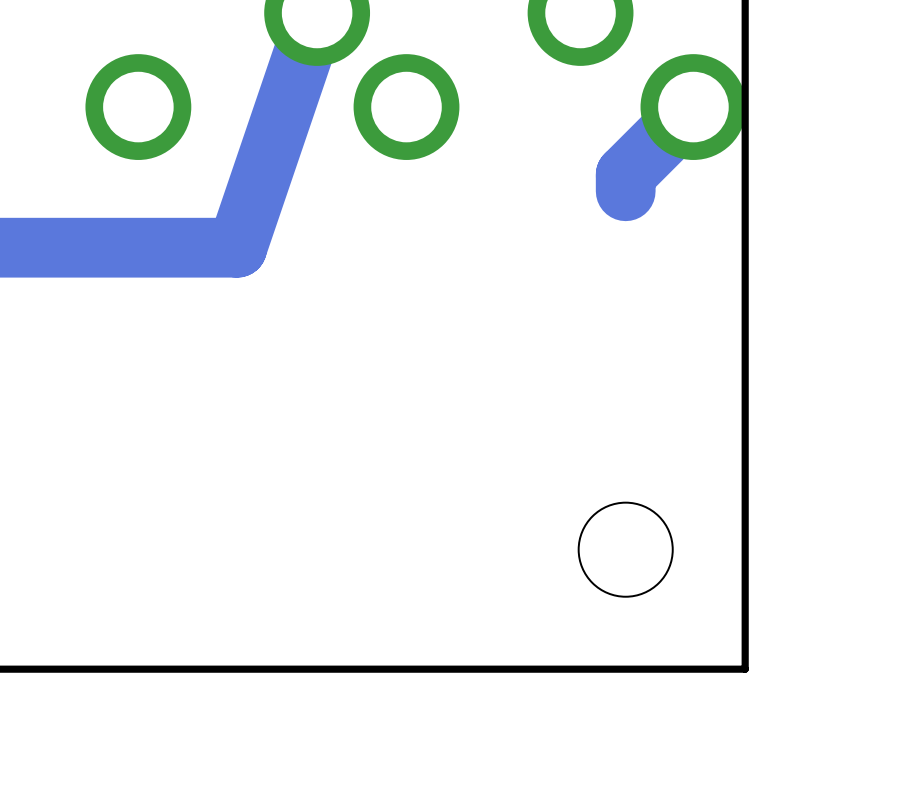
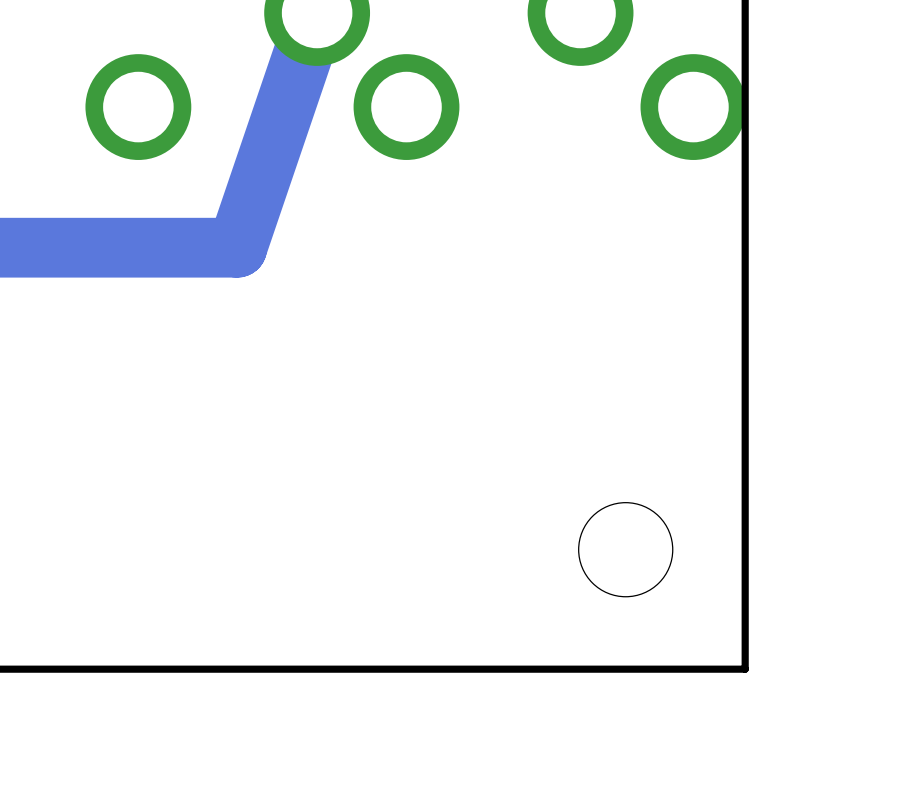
track: (693, 107) (625, 174) (625, 191) -> none

